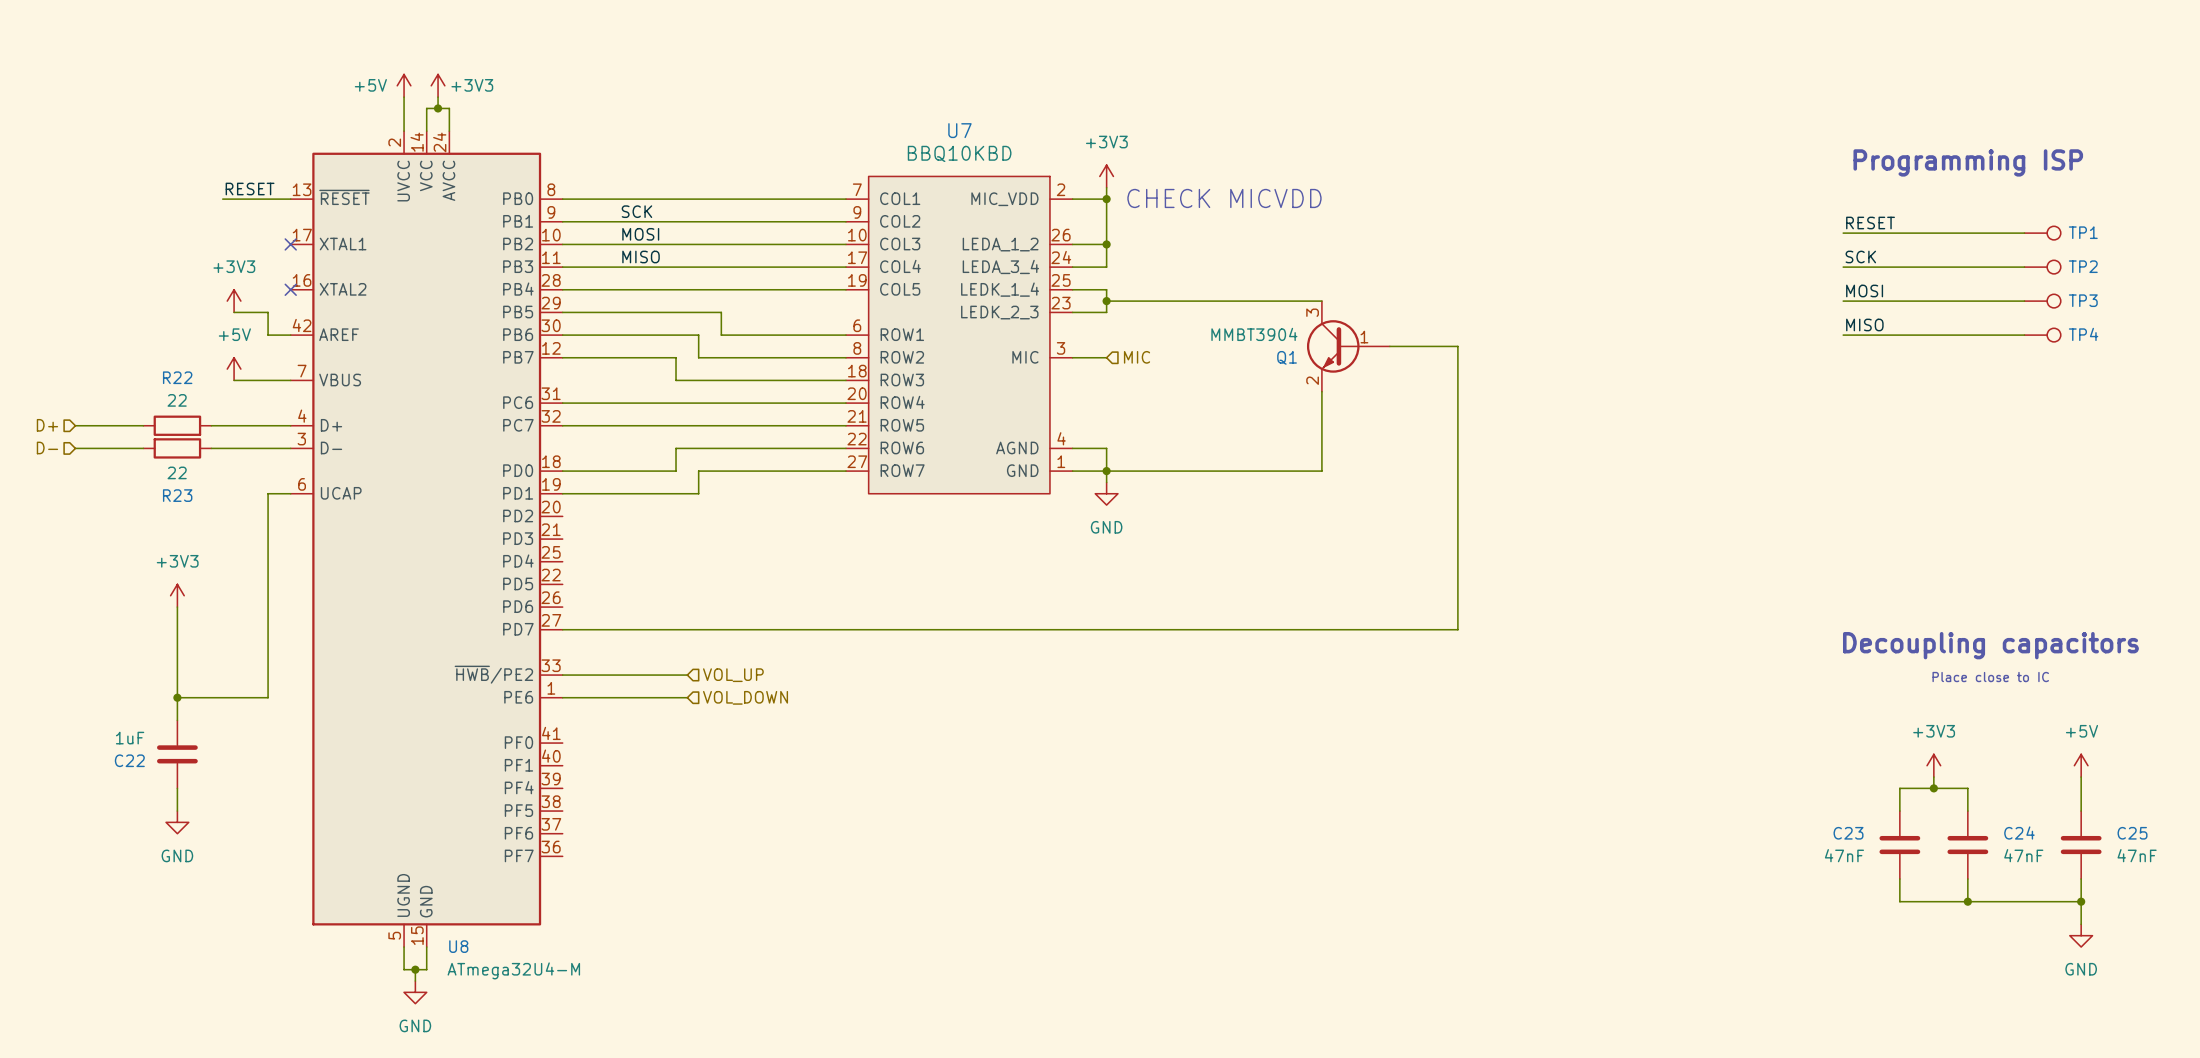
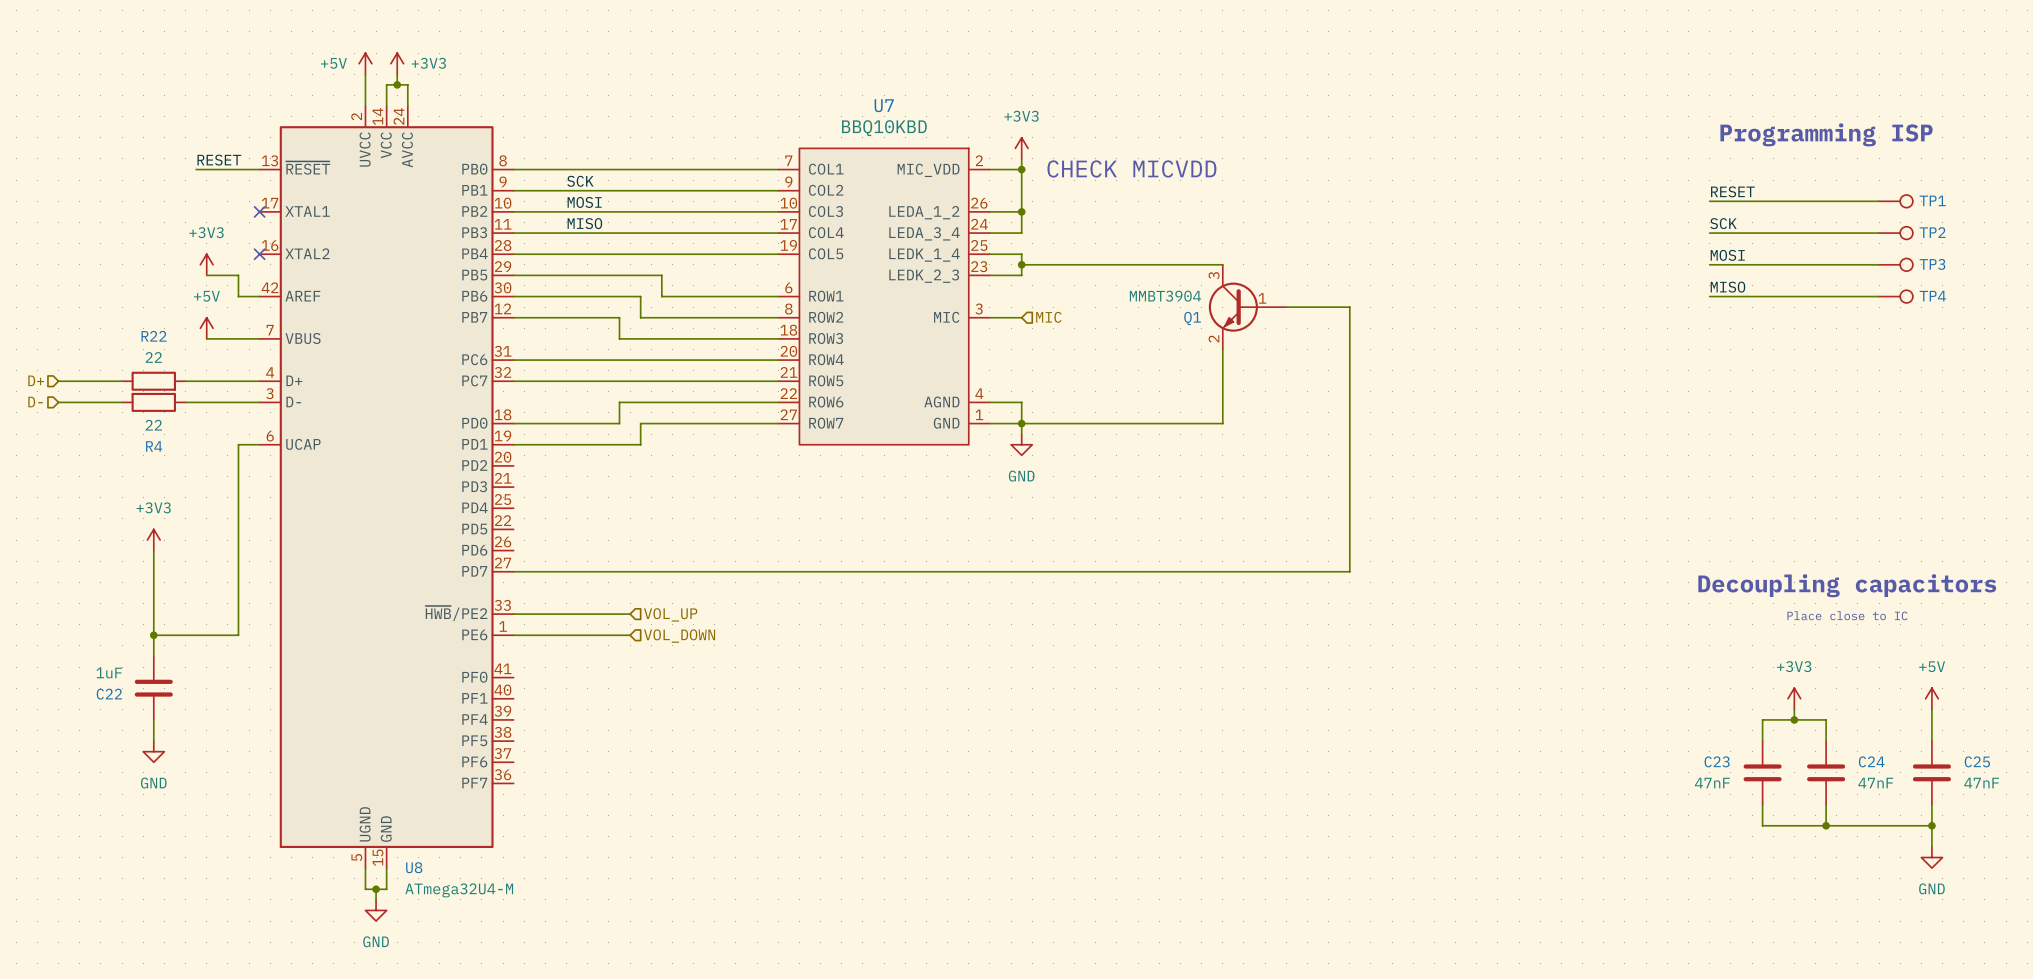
R23 name: R23 (177, 495) -> R4 (154, 446)

